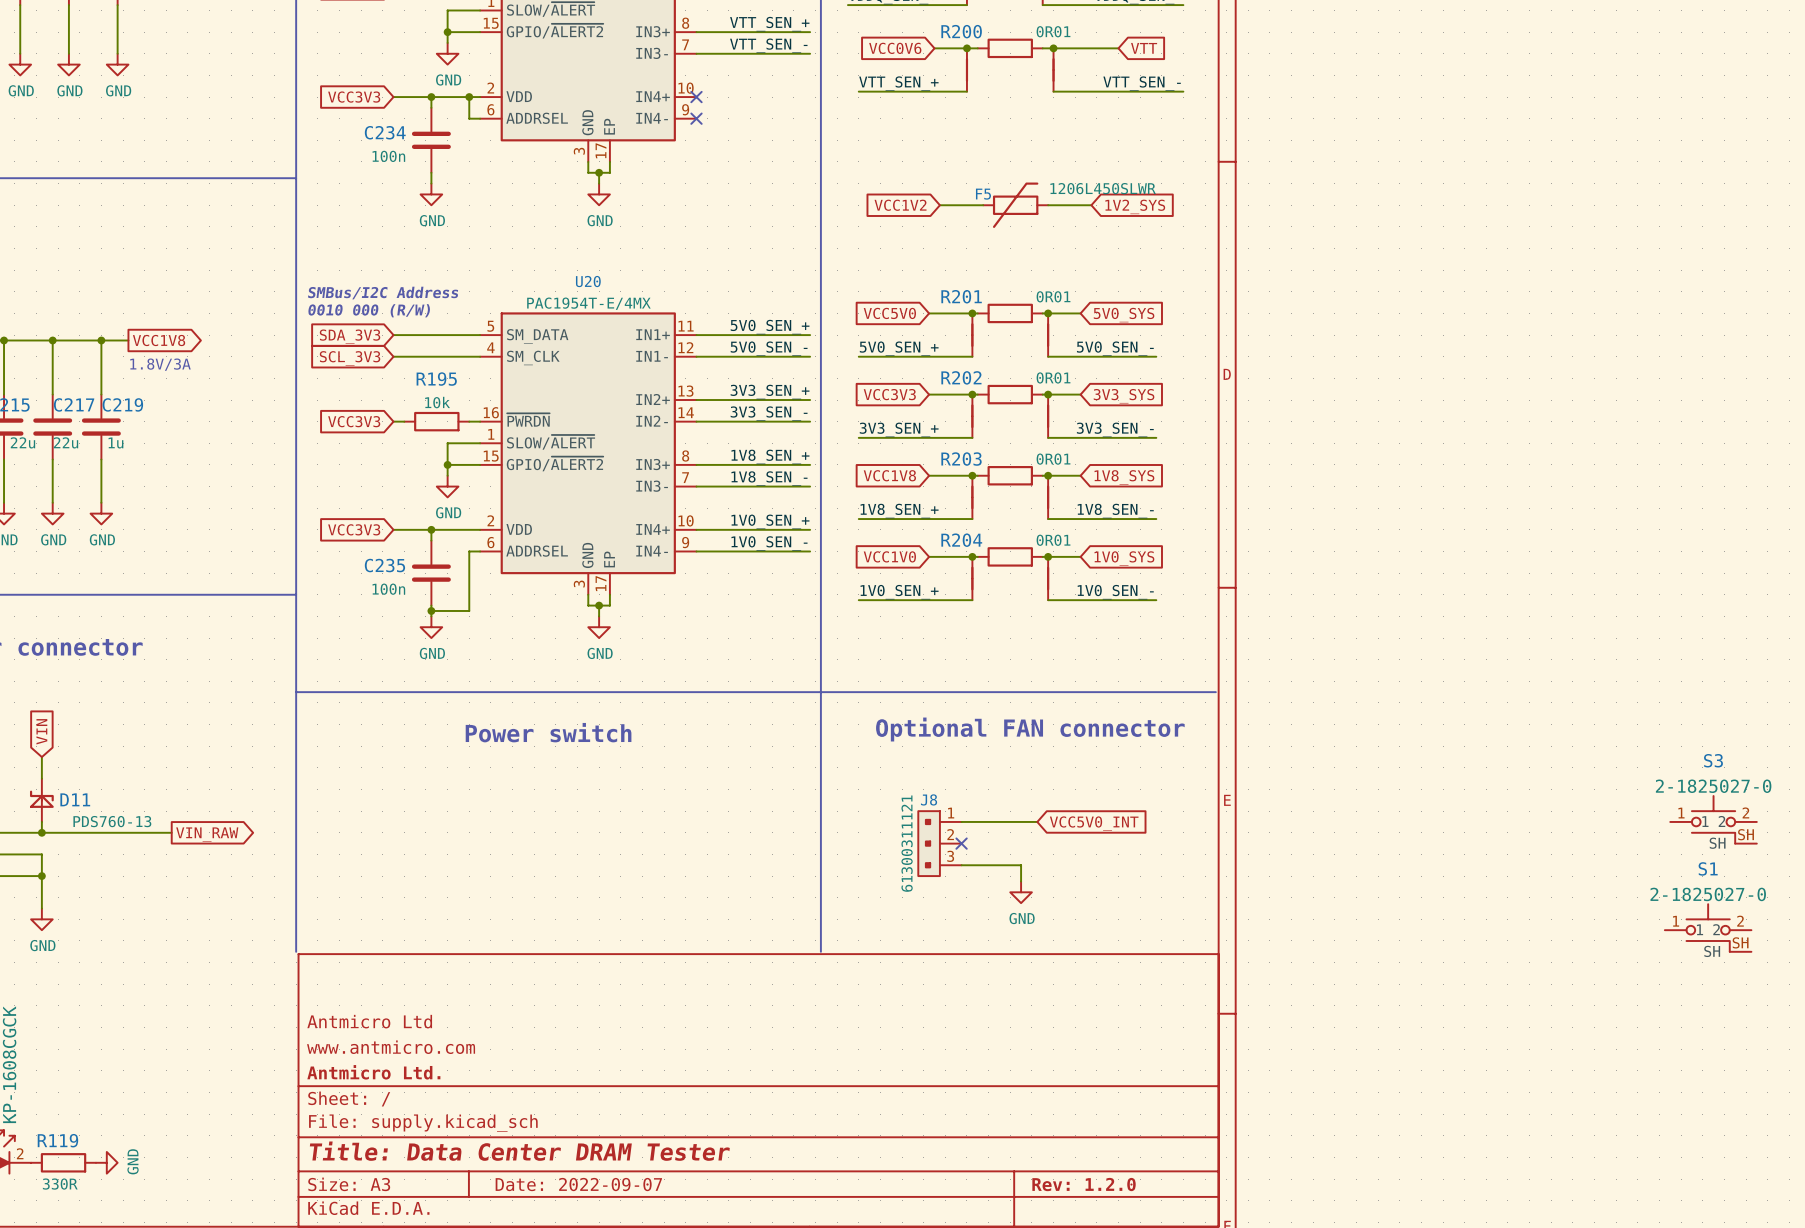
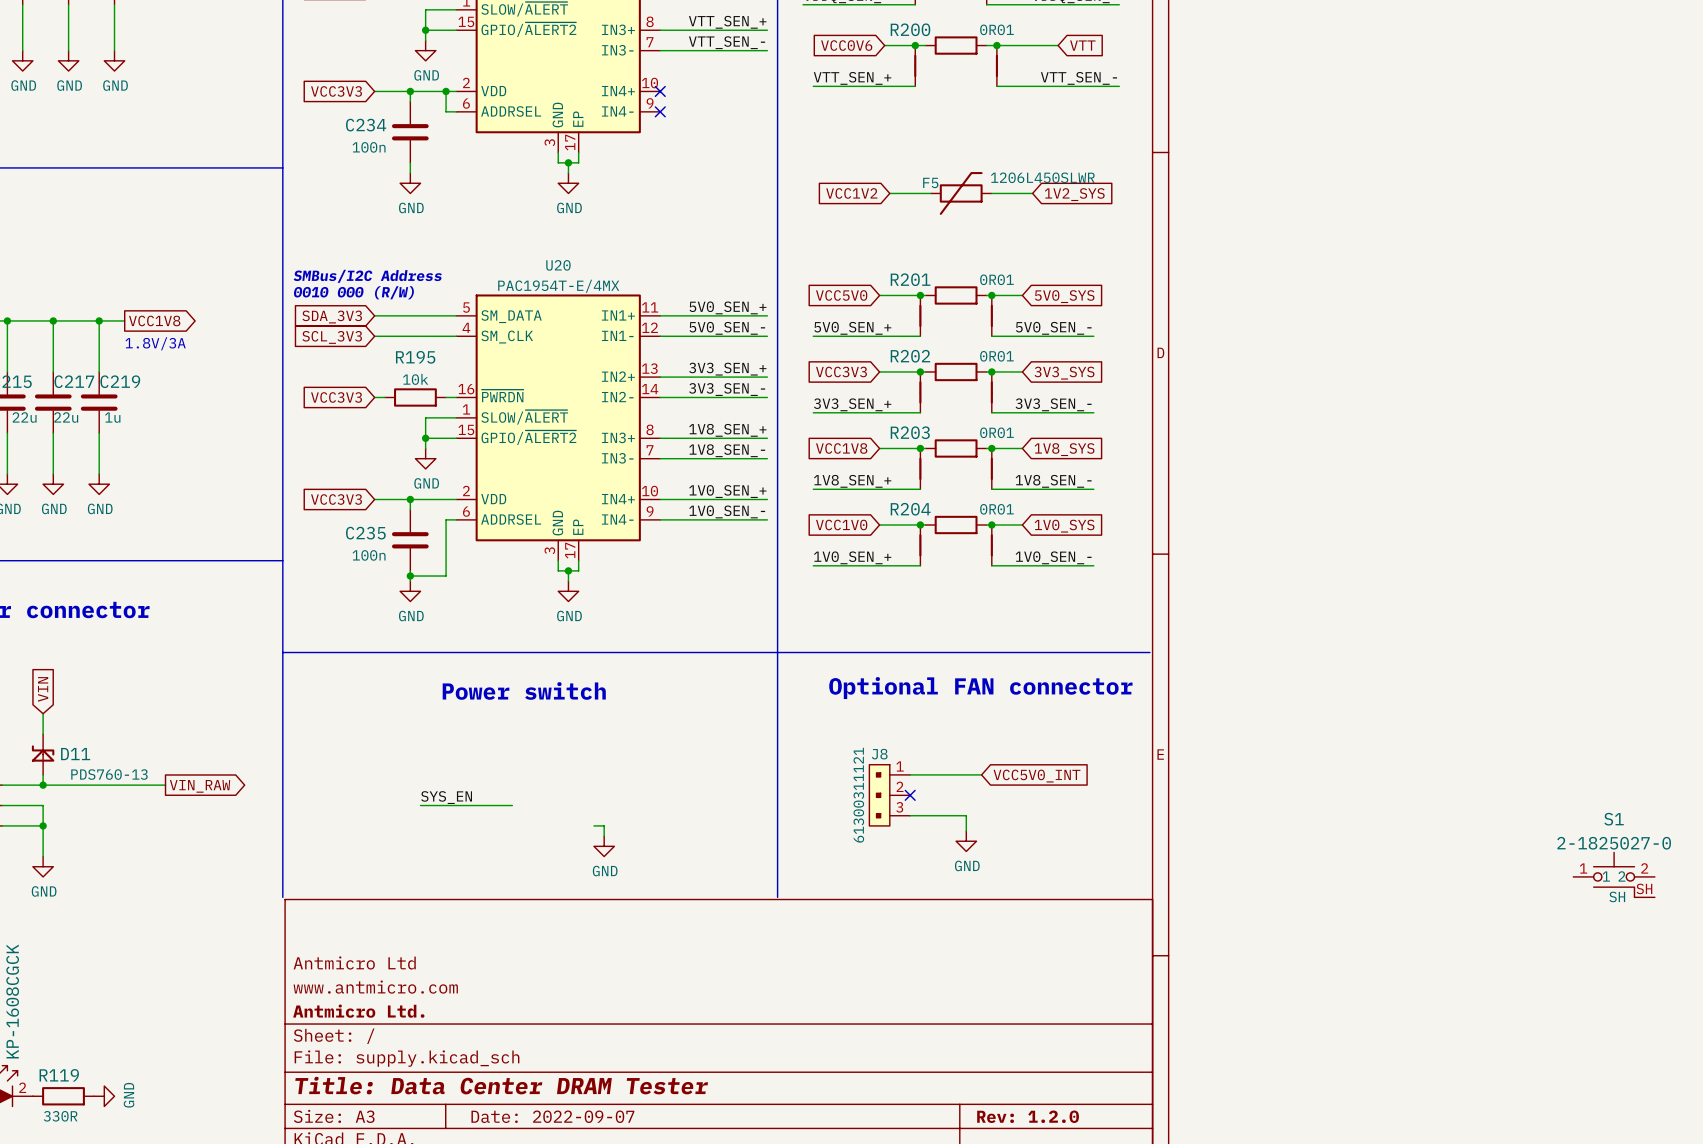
S3: 2-1825027-0 (1713, 820) -> none
label: none -> SYS_EN (446, 797)
wire: none -> (420, 805) (512, 805)
wire: none -> (593, 825) (604, 825) (604, 836)
power symbol: none -> GND (604, 846)

